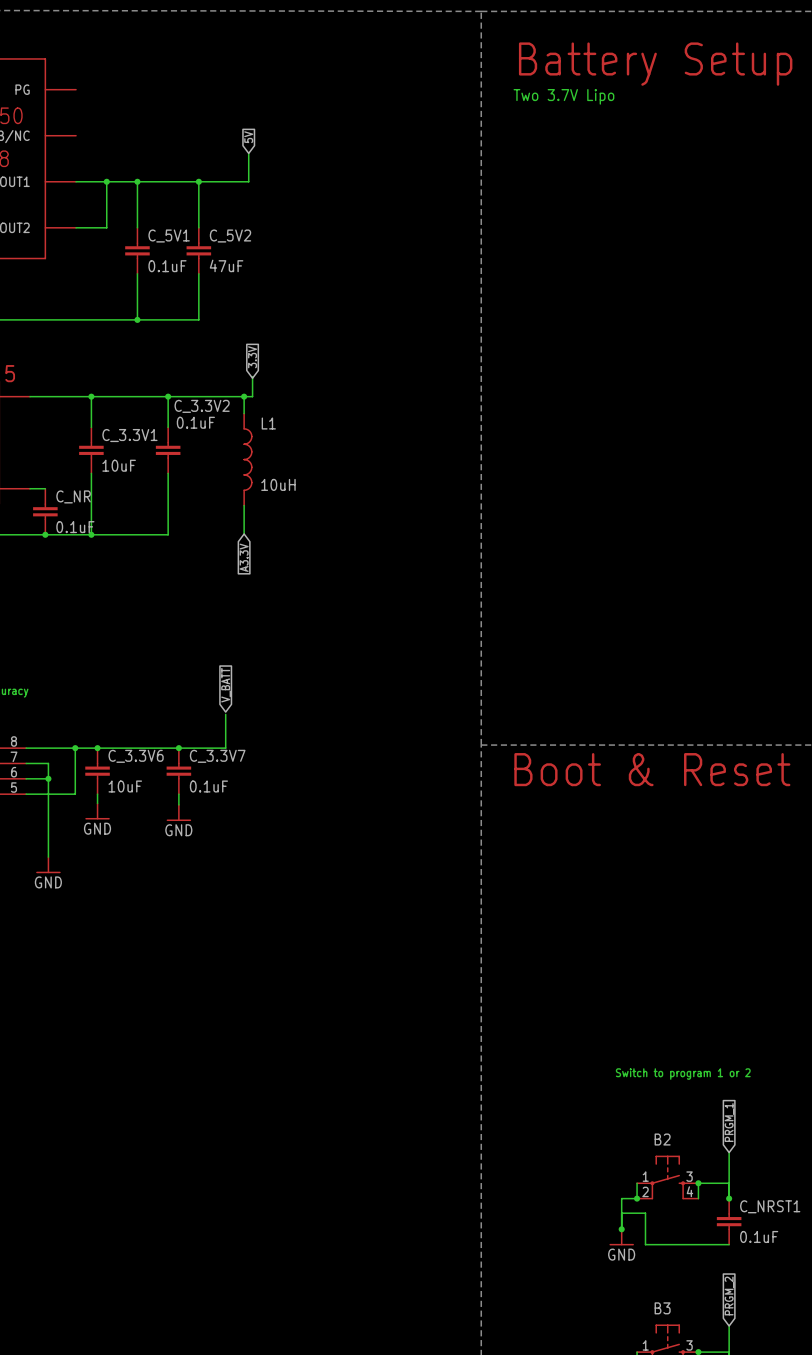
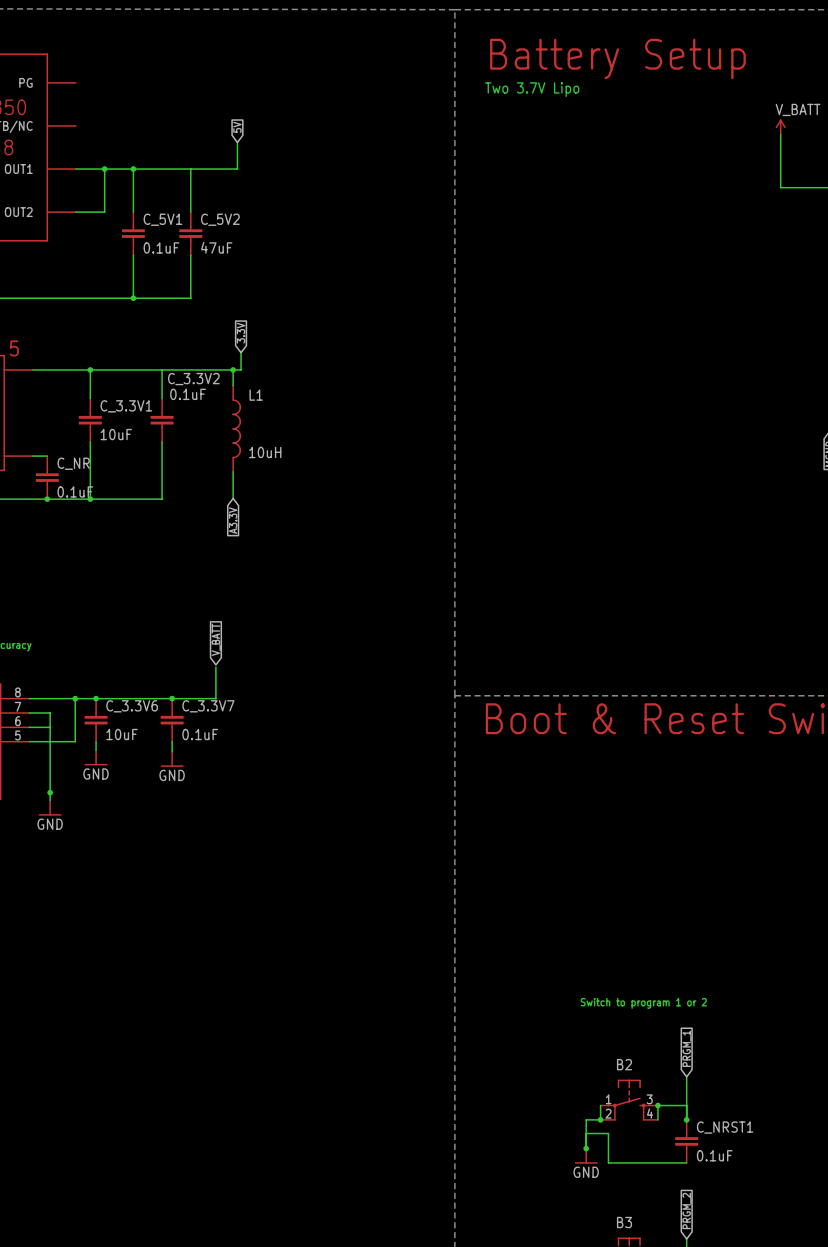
junction: (198, 181) -> none
junction: (168, 396) -> none
junction: (48, 778) -> none
junction: none -> (50, 792)

